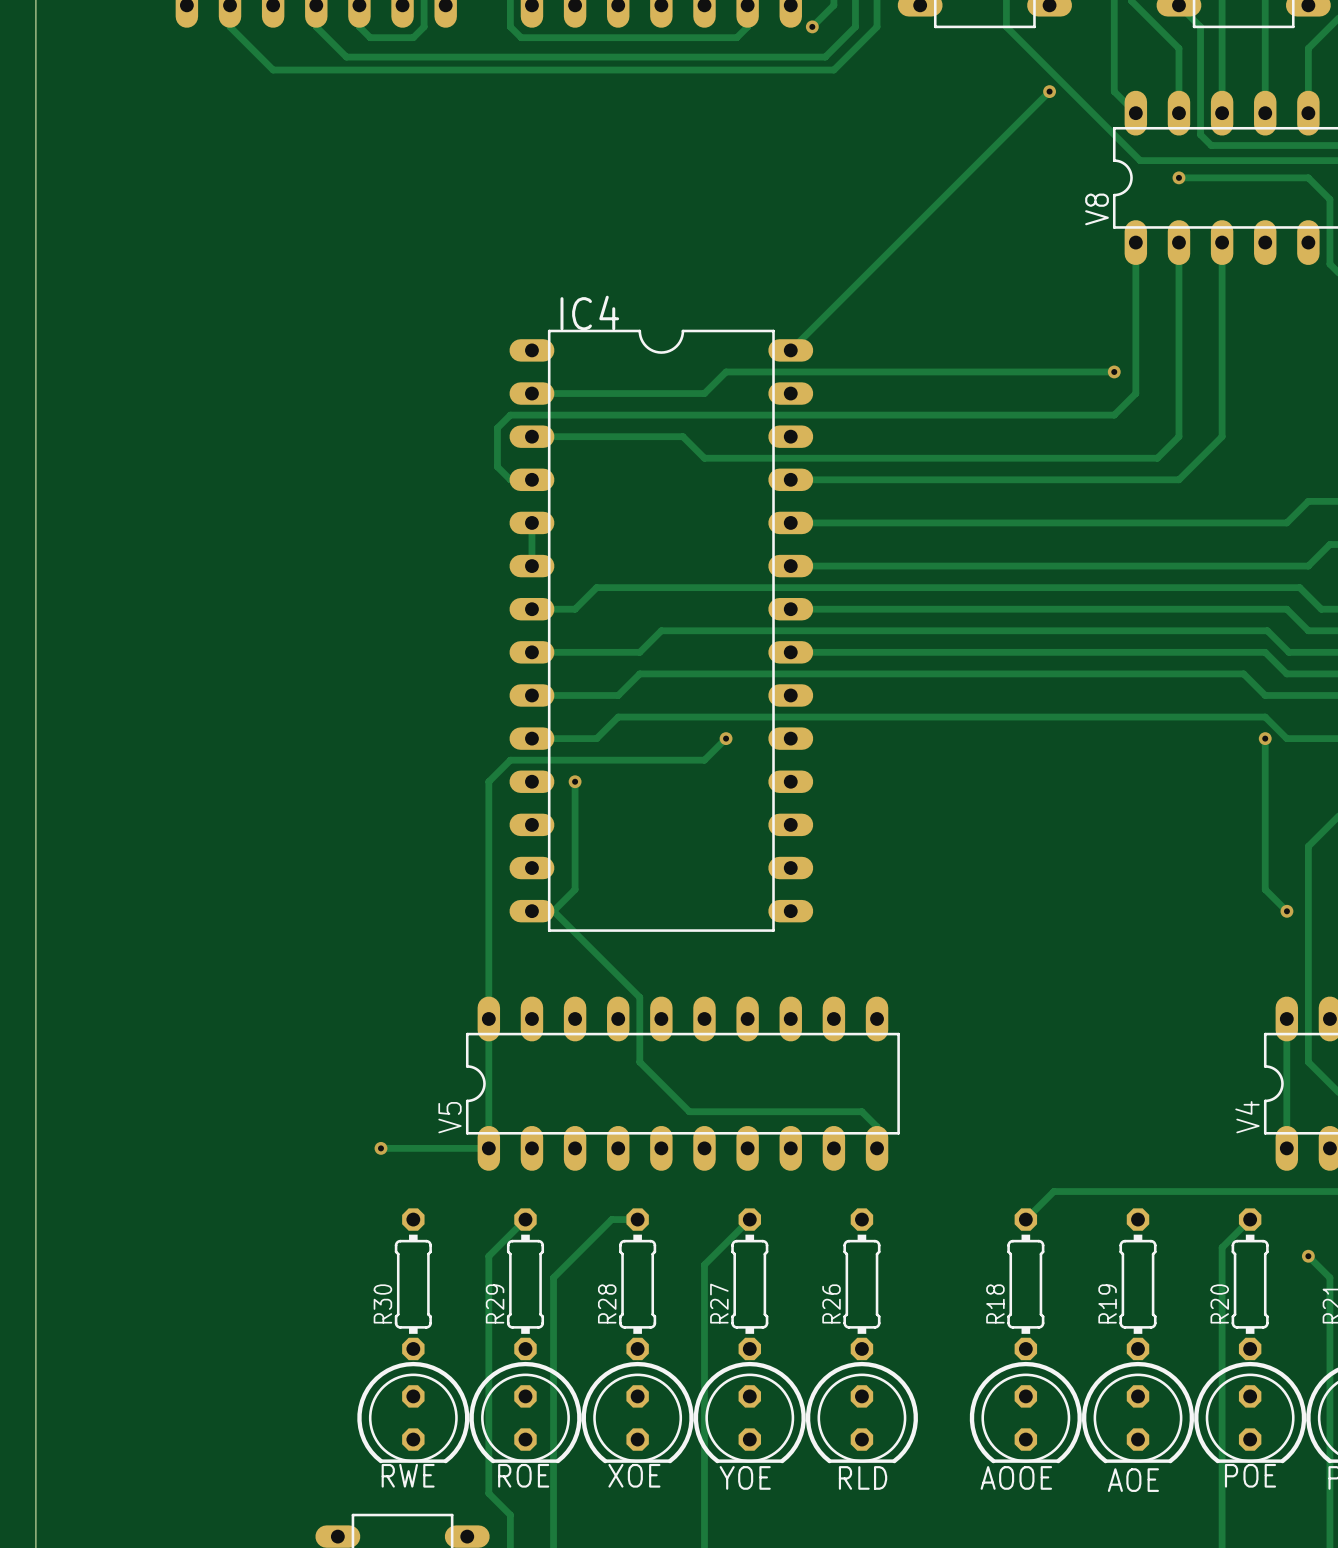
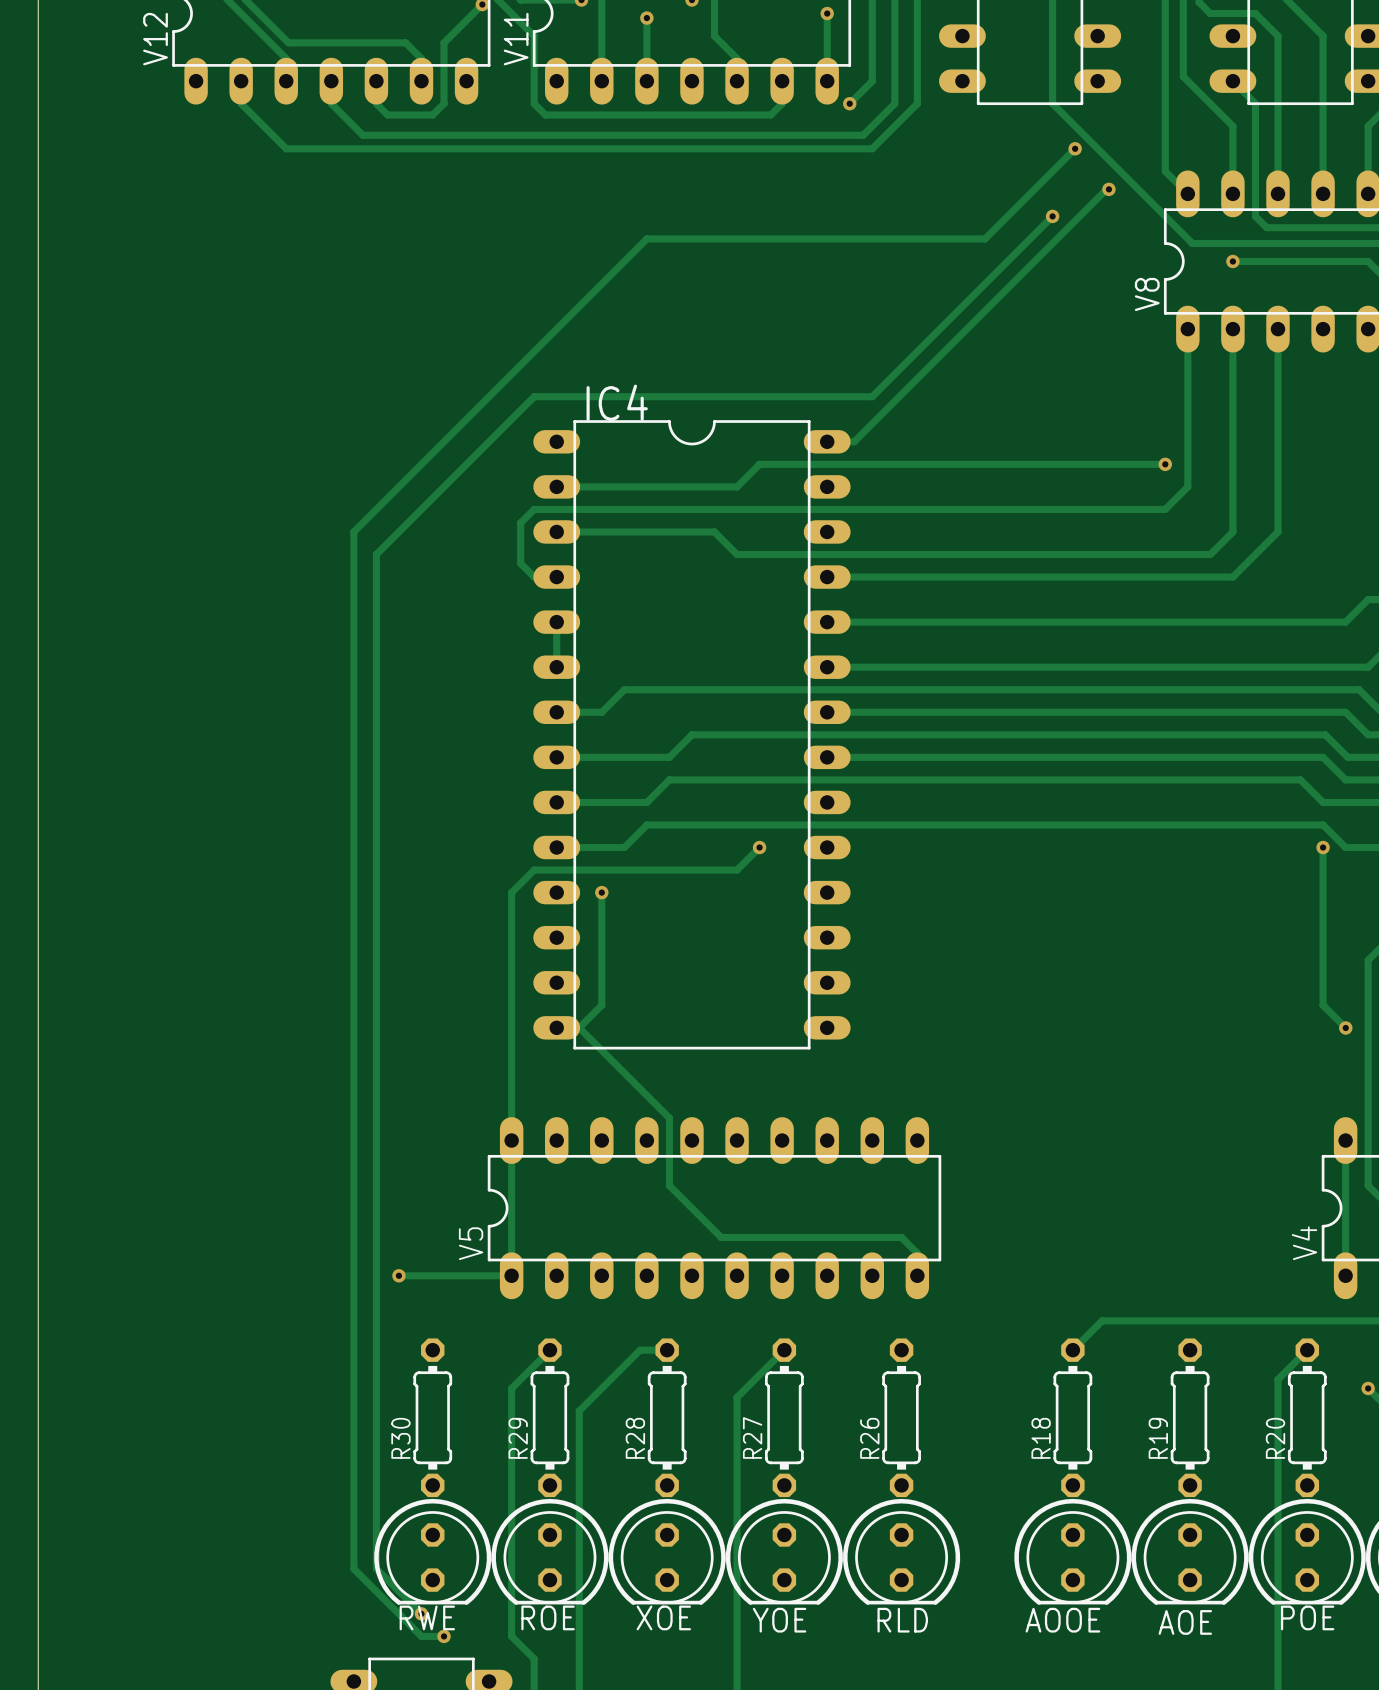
track: none -> (1075, 148) (984, 238) (646, 238) (353, 531) (353, 1568) (421, 1636) (444, 1636)
via: none -> (1075, 148)
track: (1049, 91) (1006, 134) -> none
via: (1049, 91) -> none
via: none -> (1108, 189)
via: none -> (1052, 216)
track: (833, 307) (790, 350) -> (1108, 189) (1106, 189) (854, 441) (827, 441)
track: none -> (872, 396) (534, 396) (376, 554) (376, 1568) (421, 1613)
via: none -> (421, 1613)
via: none -> (444, 1636)

